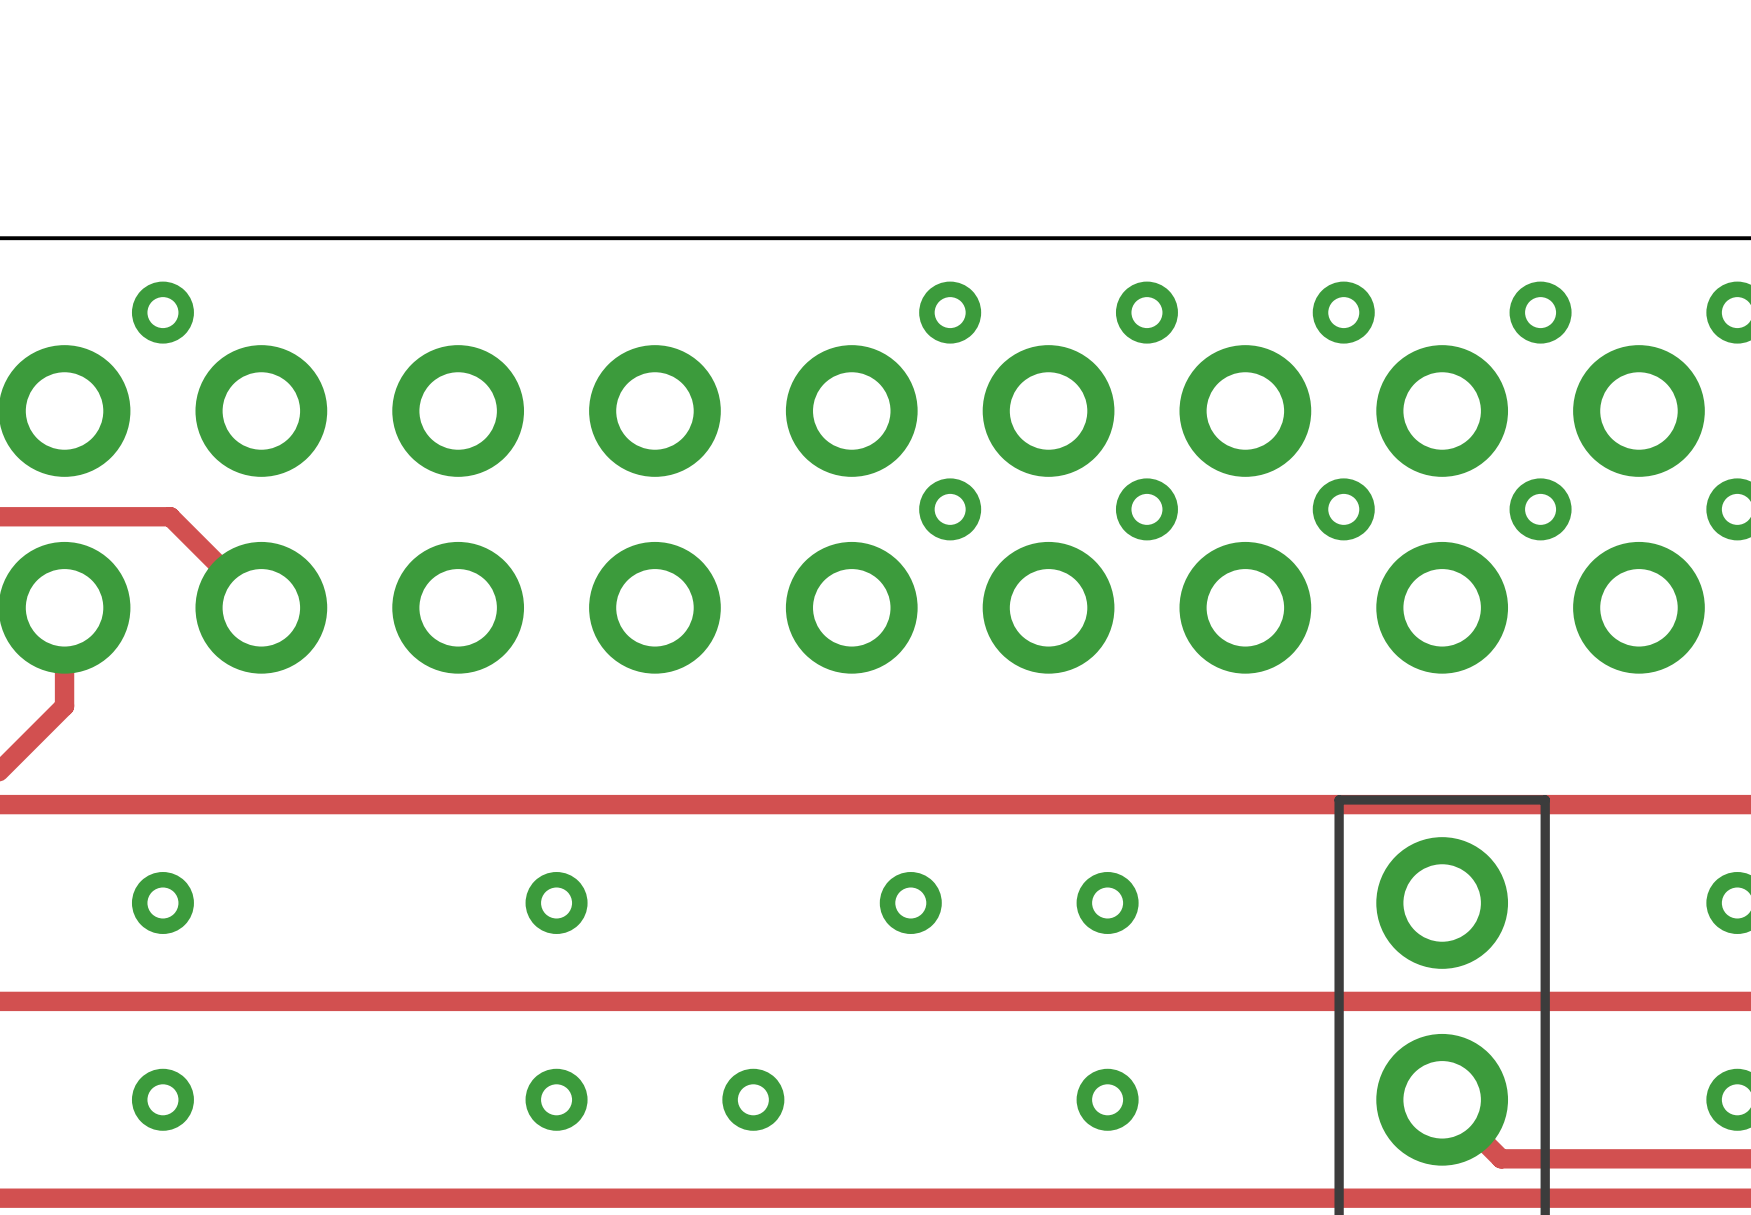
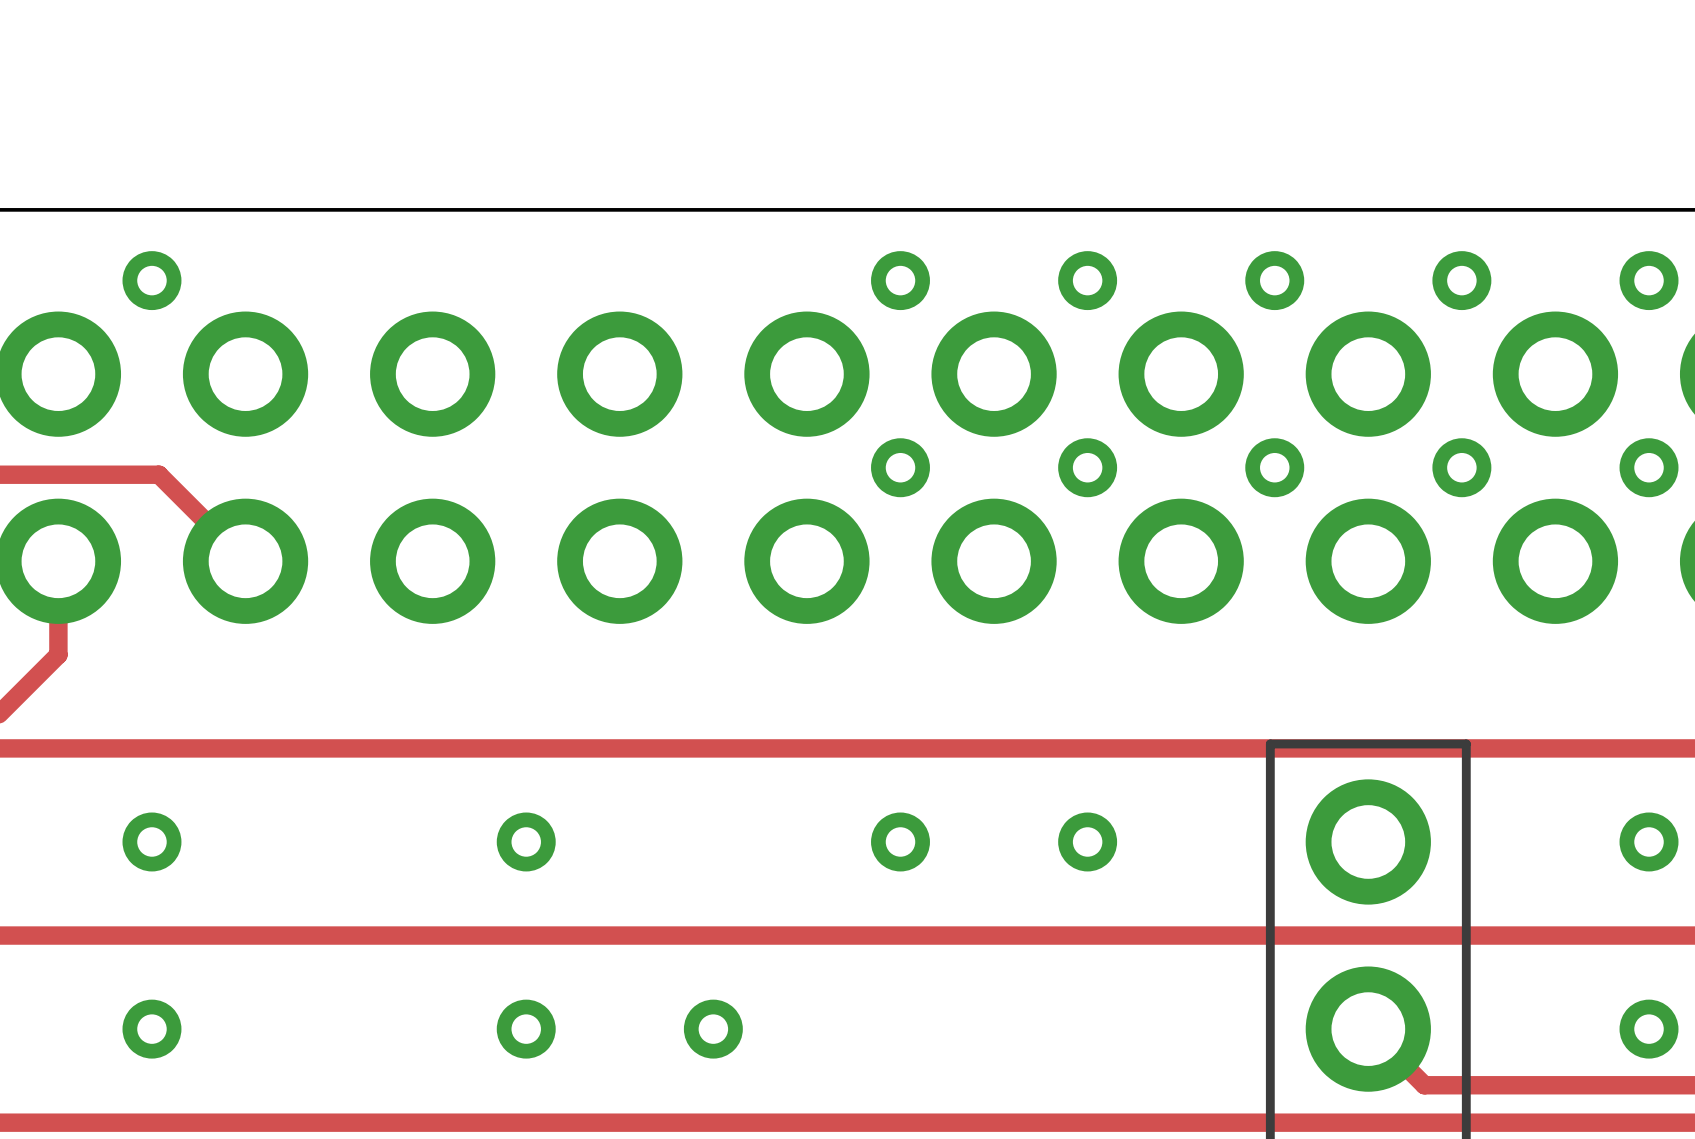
via position: (910, 903) -> (900, 841)
via position: (1107, 903) -> (1087, 841)
via: (1107, 1099) -> none

